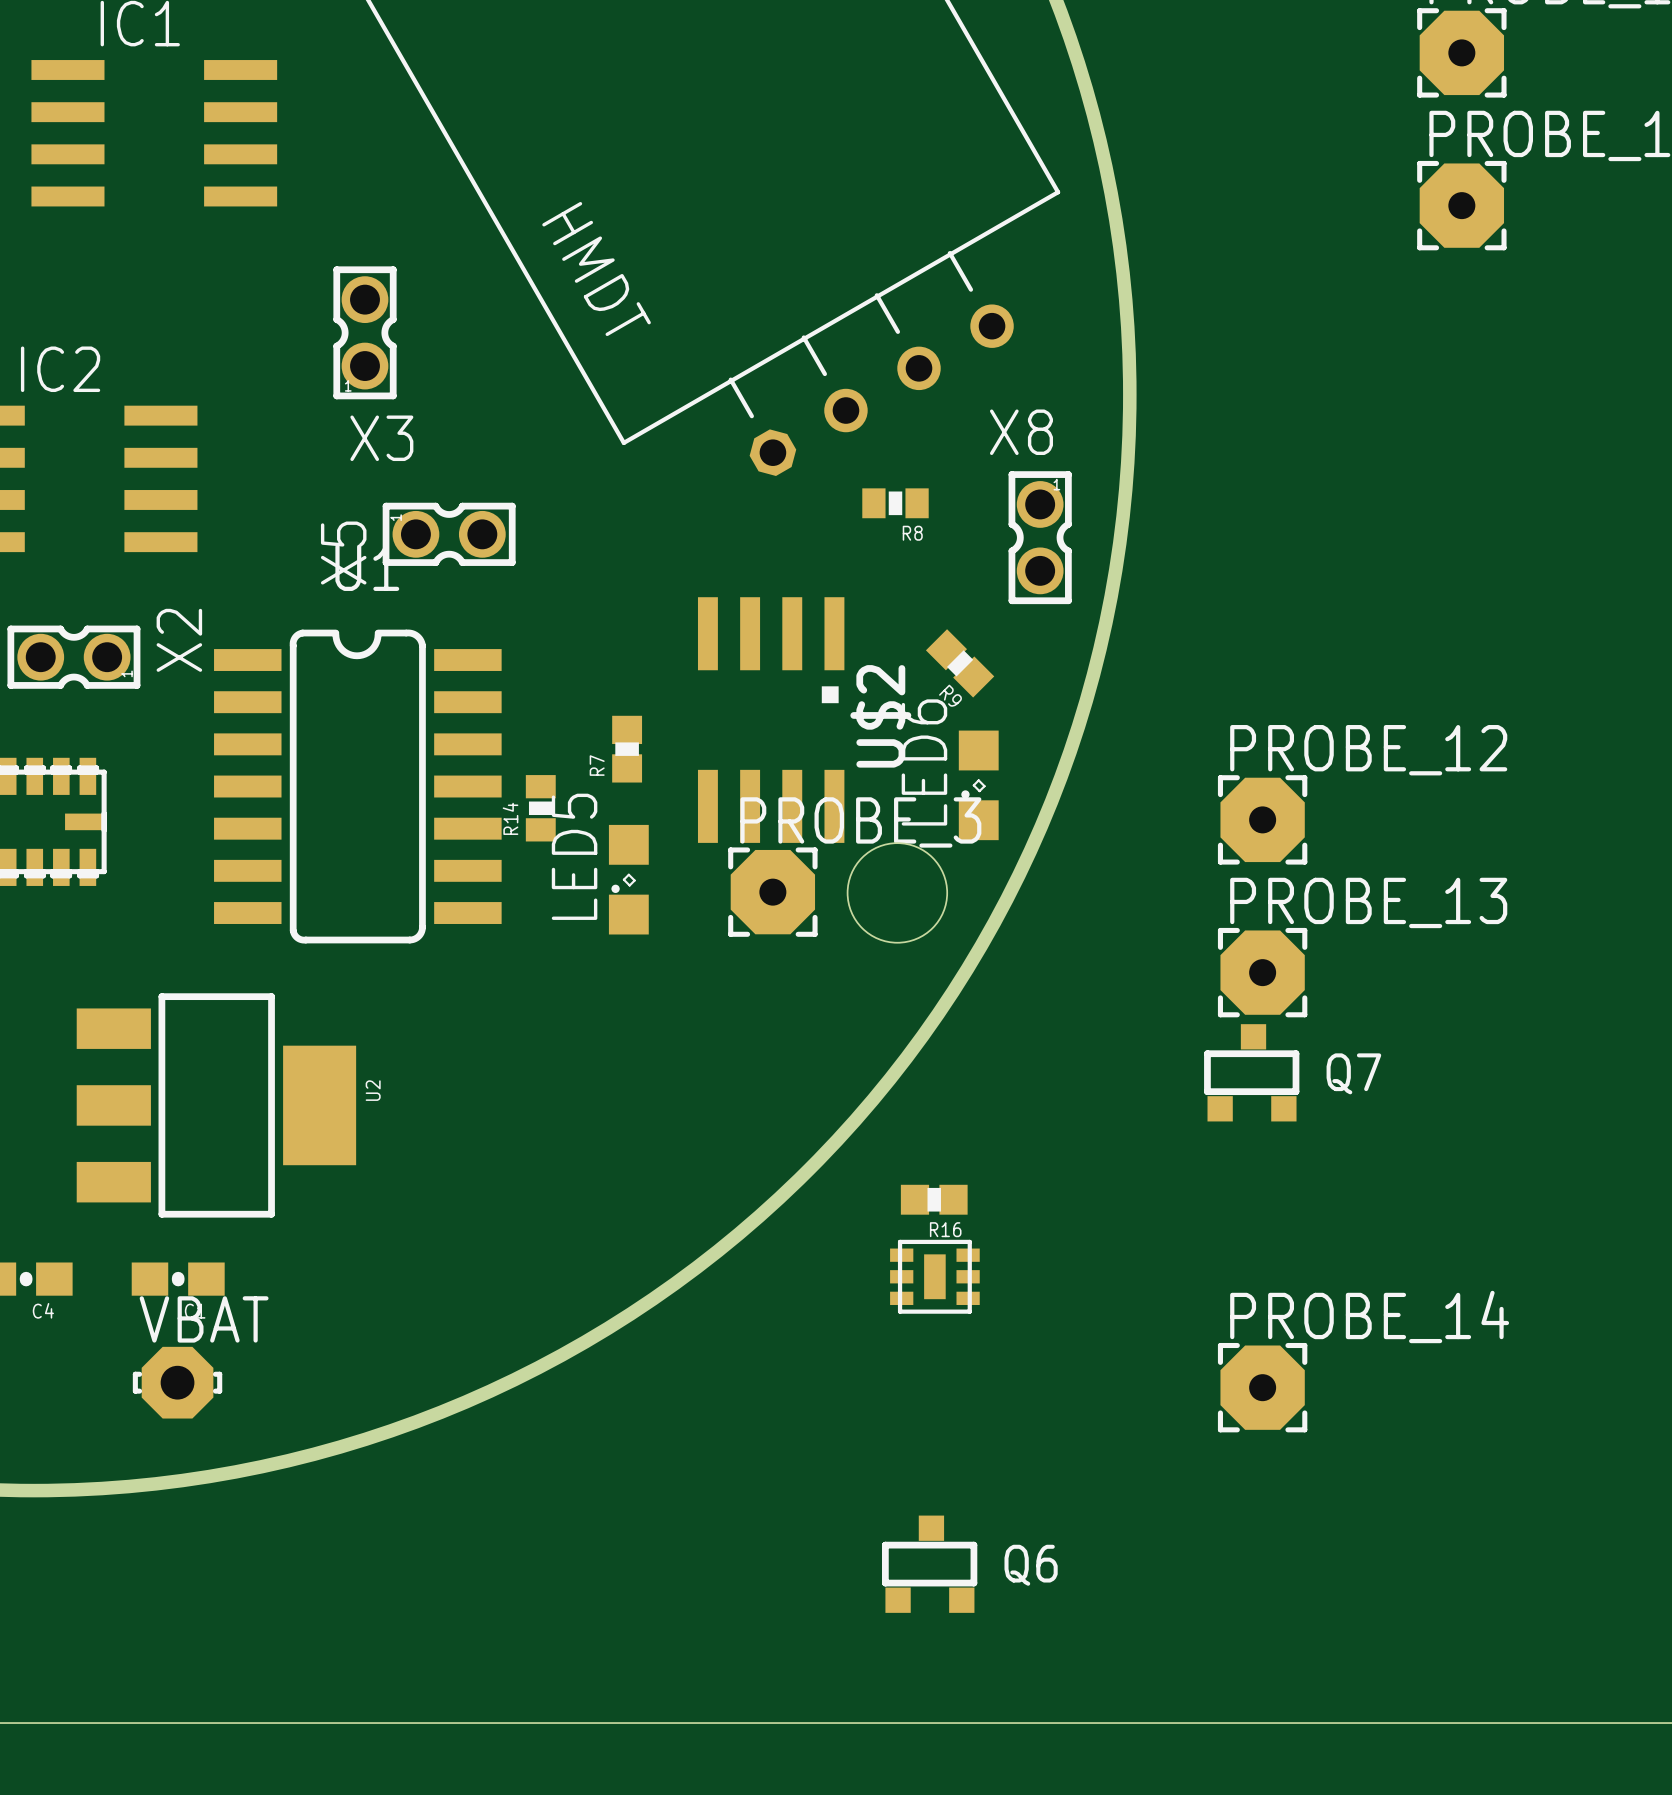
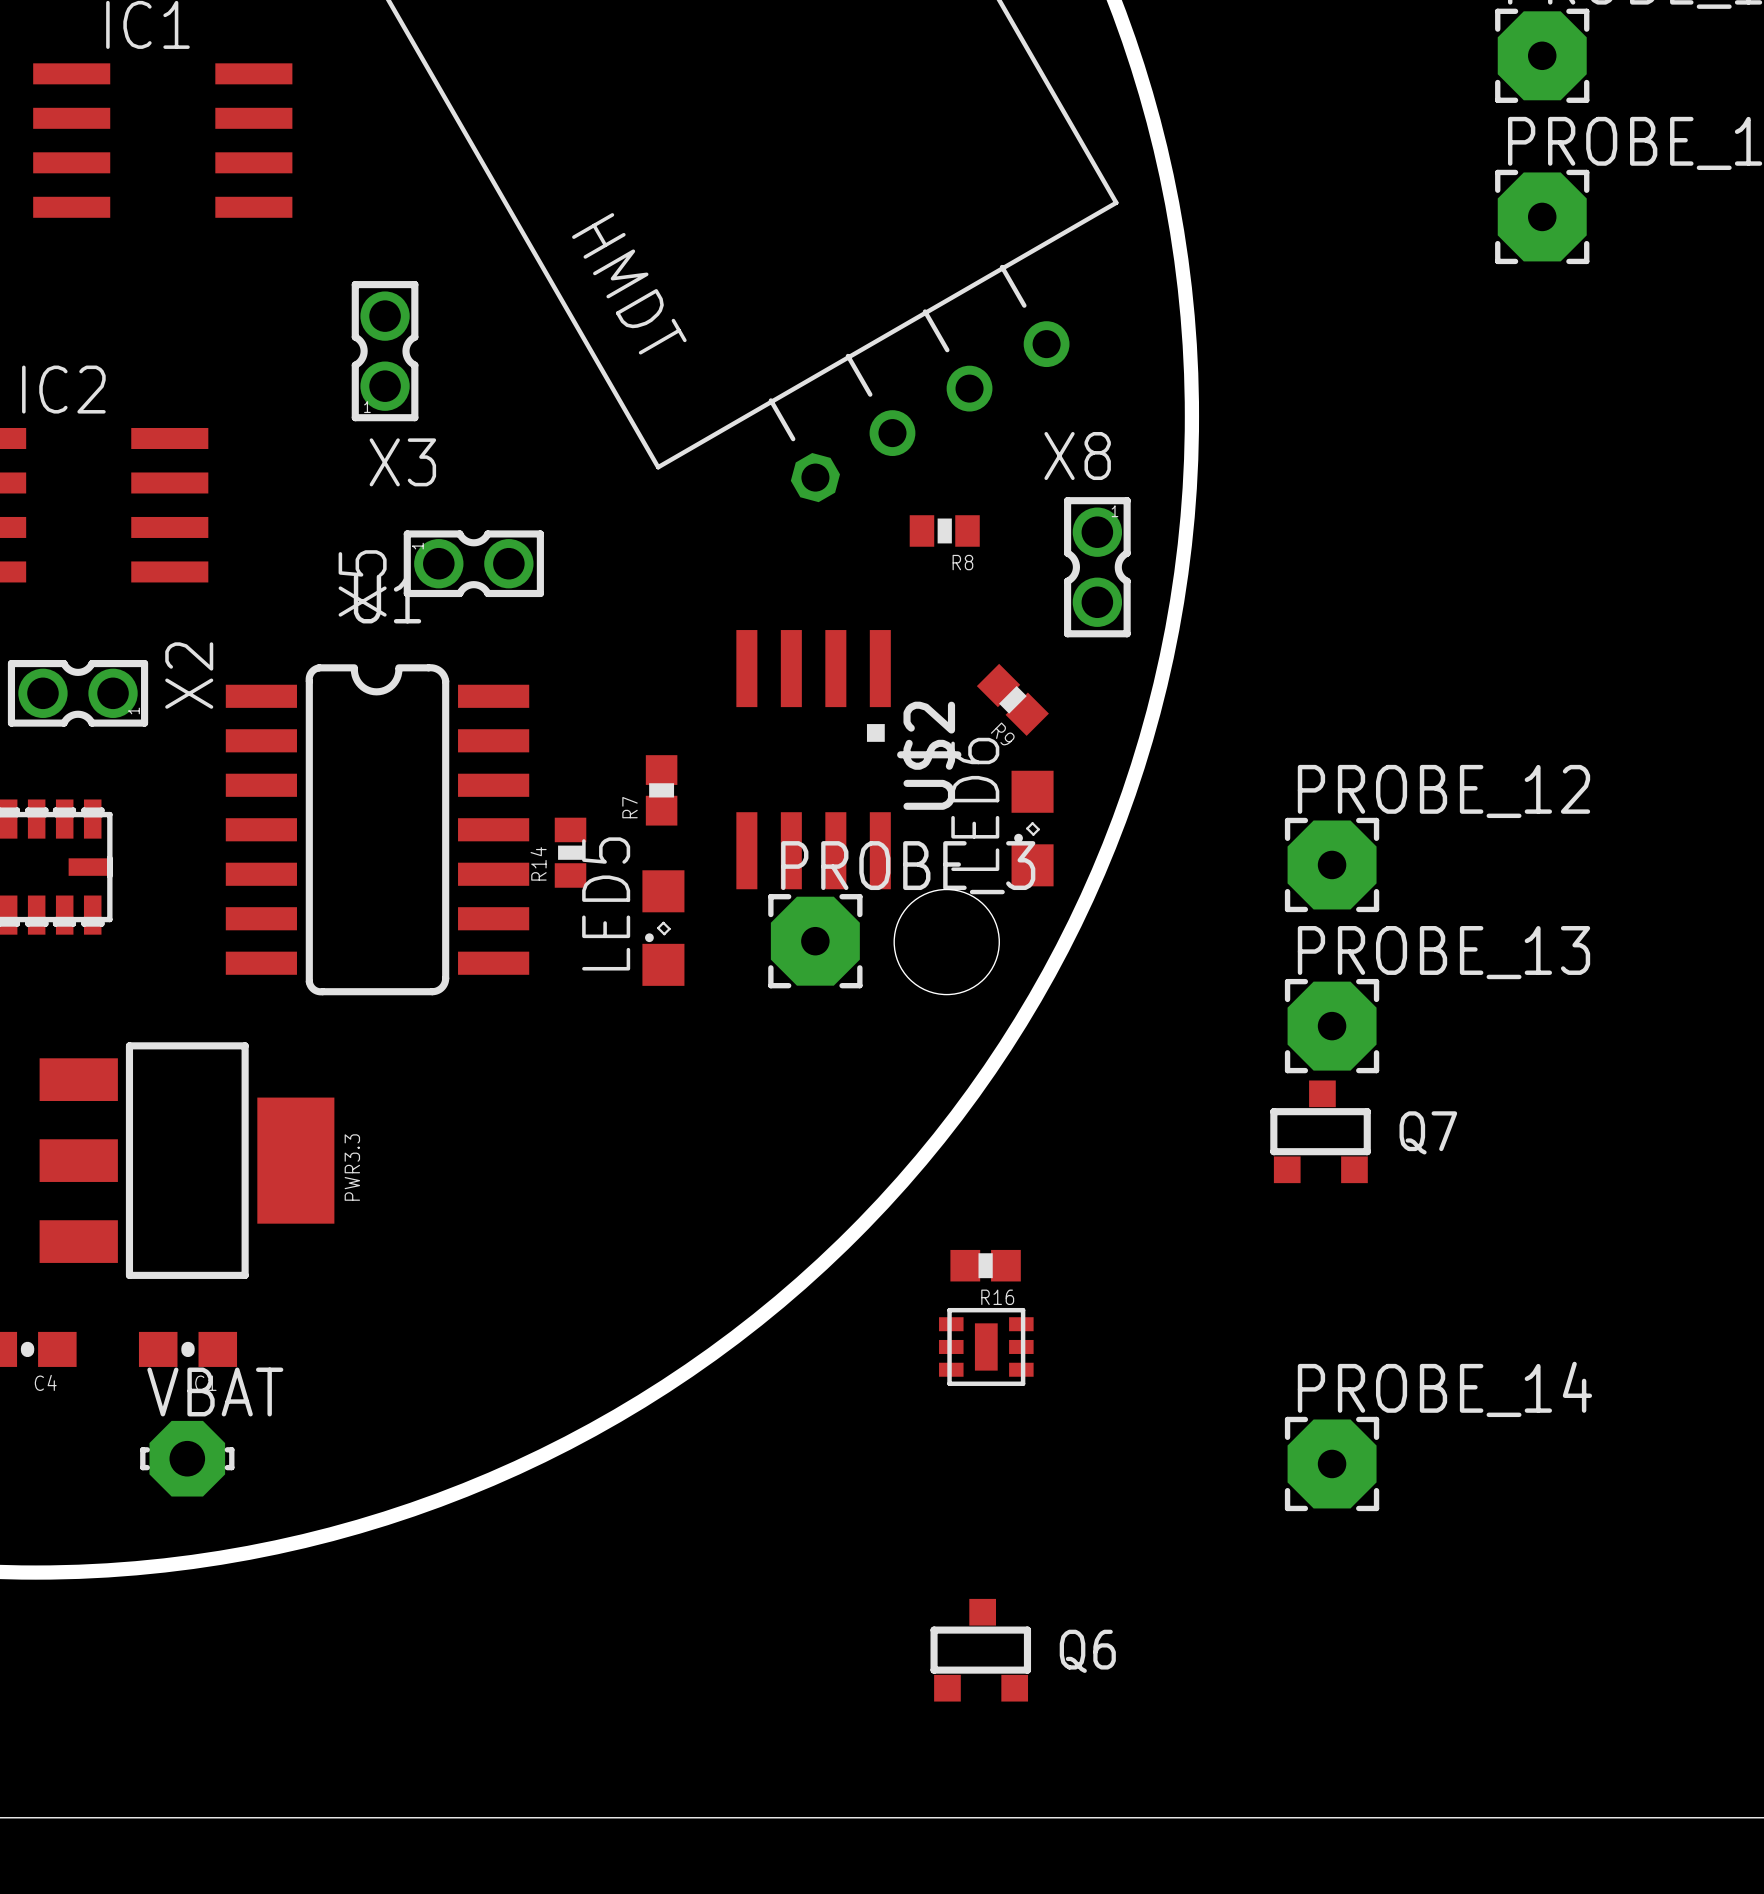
PWR3.3: none -> (186, 1160)
U2: (216, 1105) -> none

